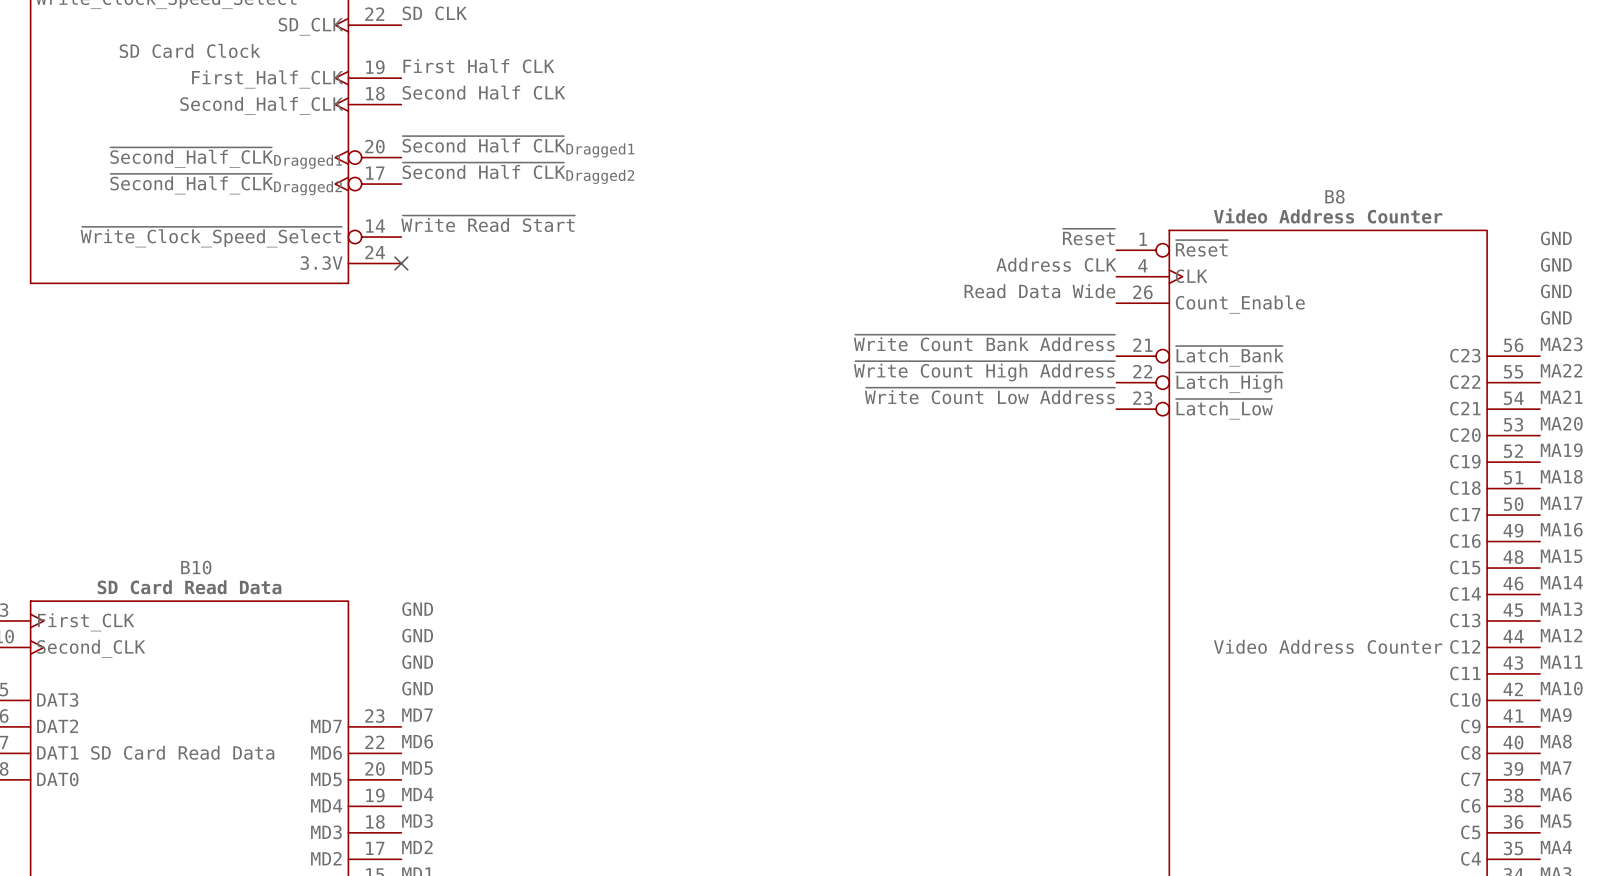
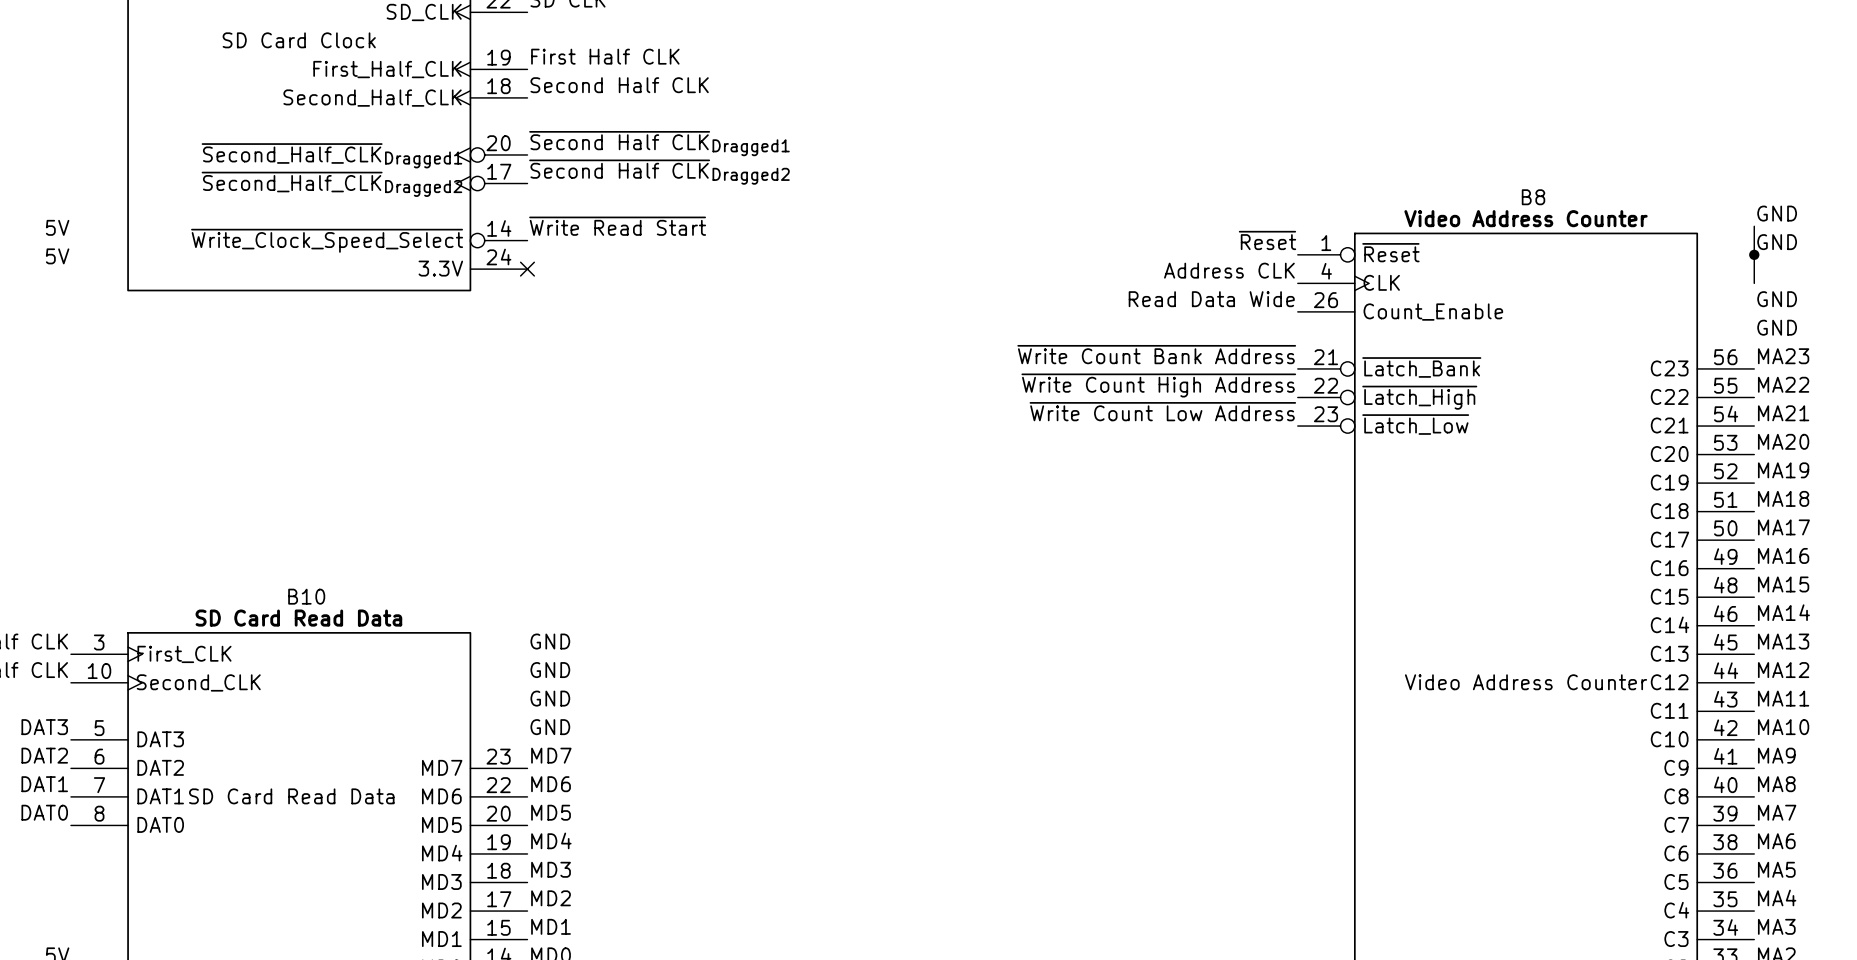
wire: none -> (1754, 226) (1754, 283)
junction: none -> (1754, 254)
label position: GND (1556, 264) -> GND (1777, 213)

